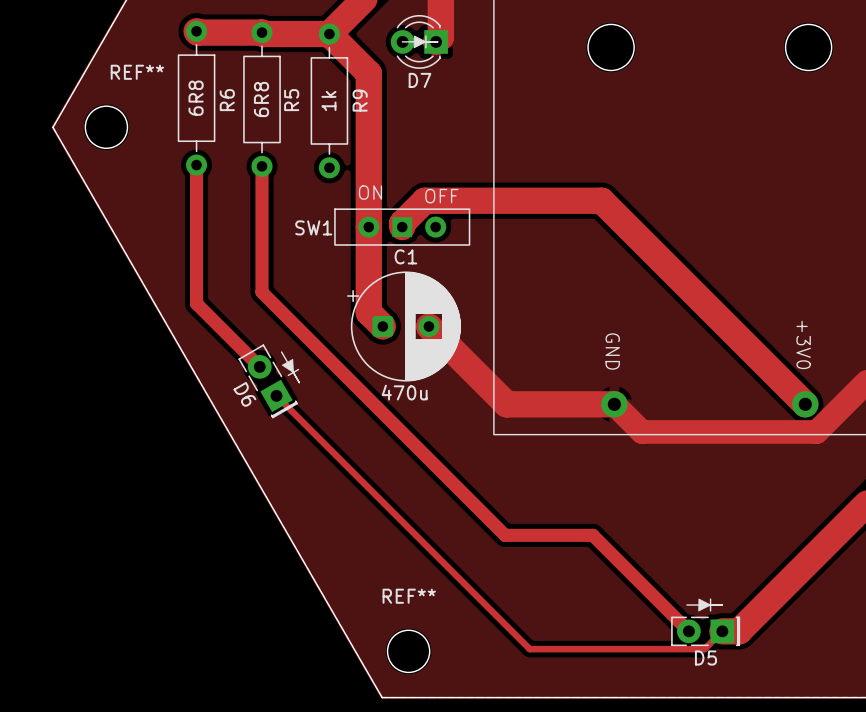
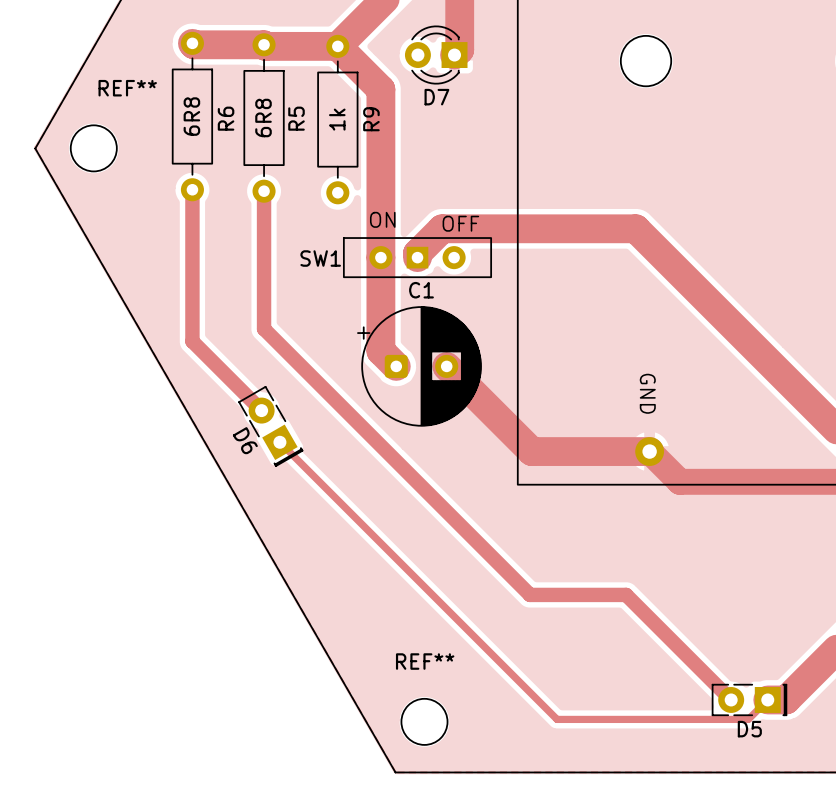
drawing: [401, 35, 439, 49] -> none
D6 footprint: [238, 344, 300, 419] -> [238, 385, 304, 467]
C1 value: 470u (404, 392) -> none
D5 footprint: [671, 598, 741, 647] -> [711, 683, 788, 717]

